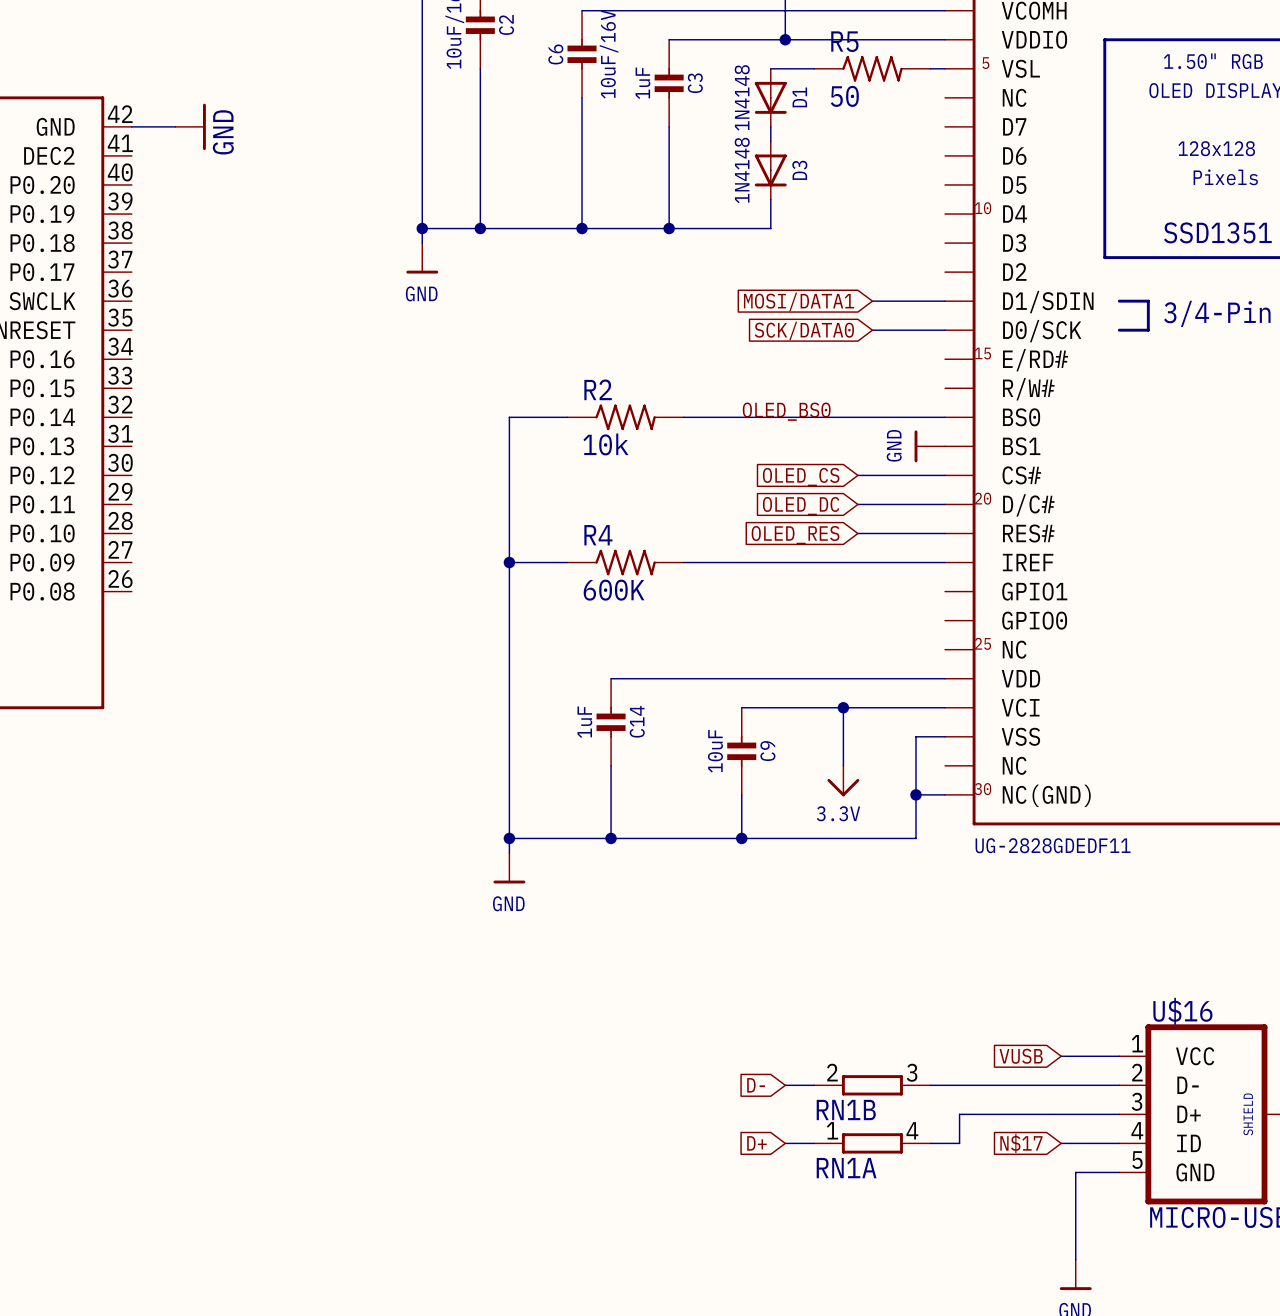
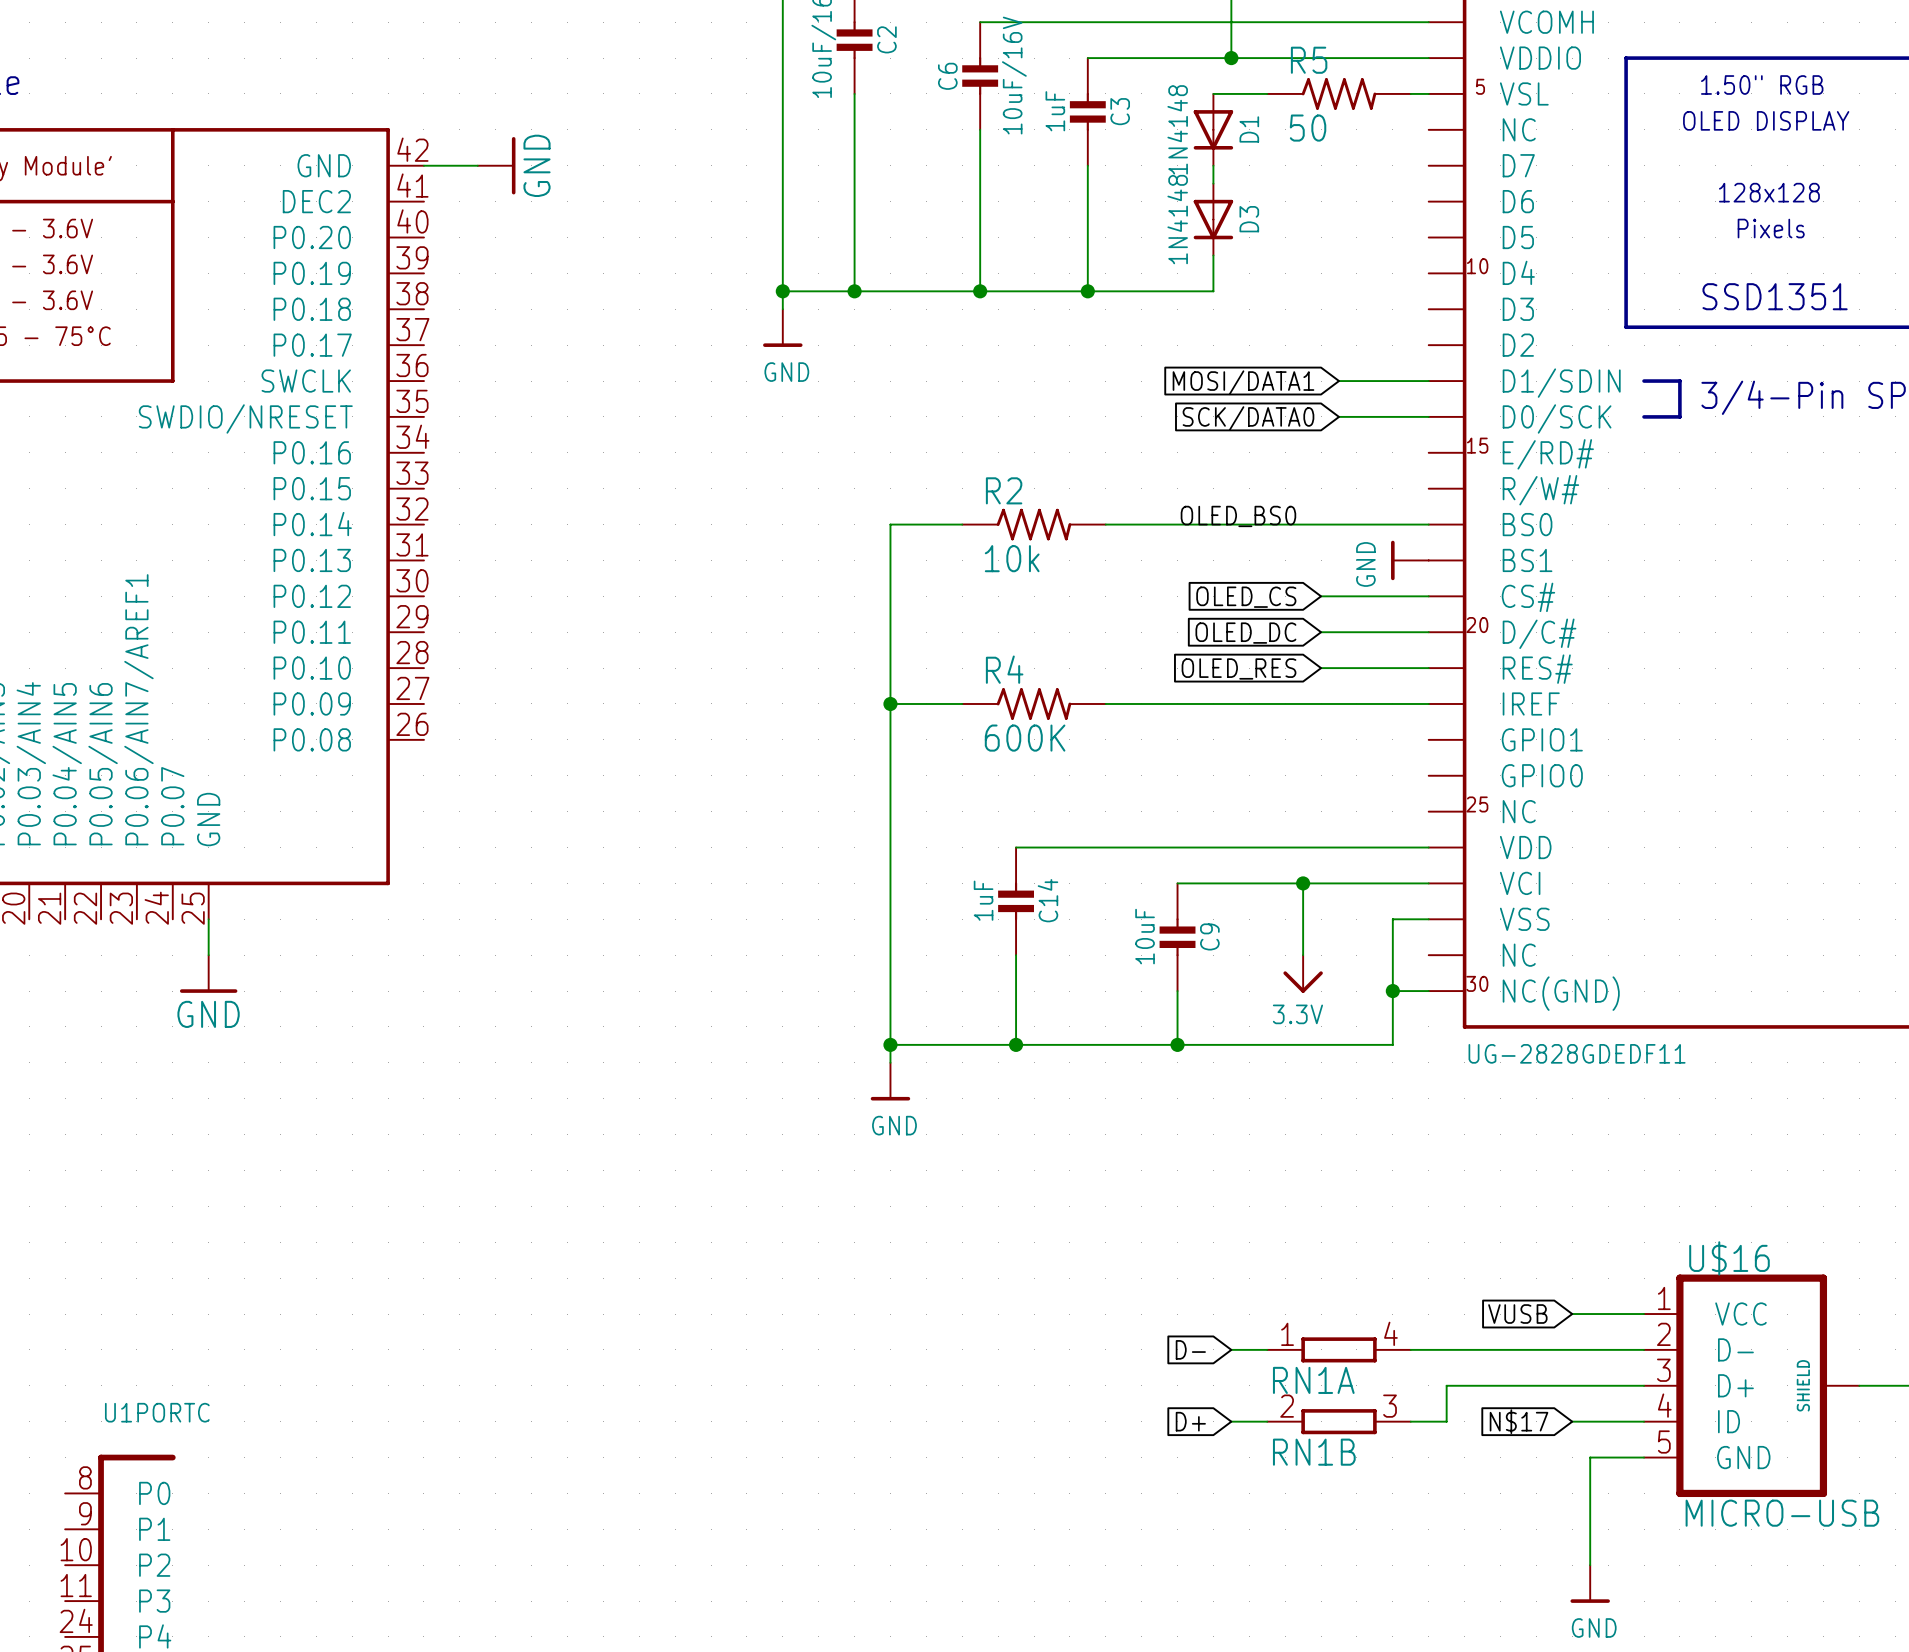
RN1B position: (872, 1085) -> (1339, 1421)
RN1A position: (872, 1143) -> (1339, 1349)

